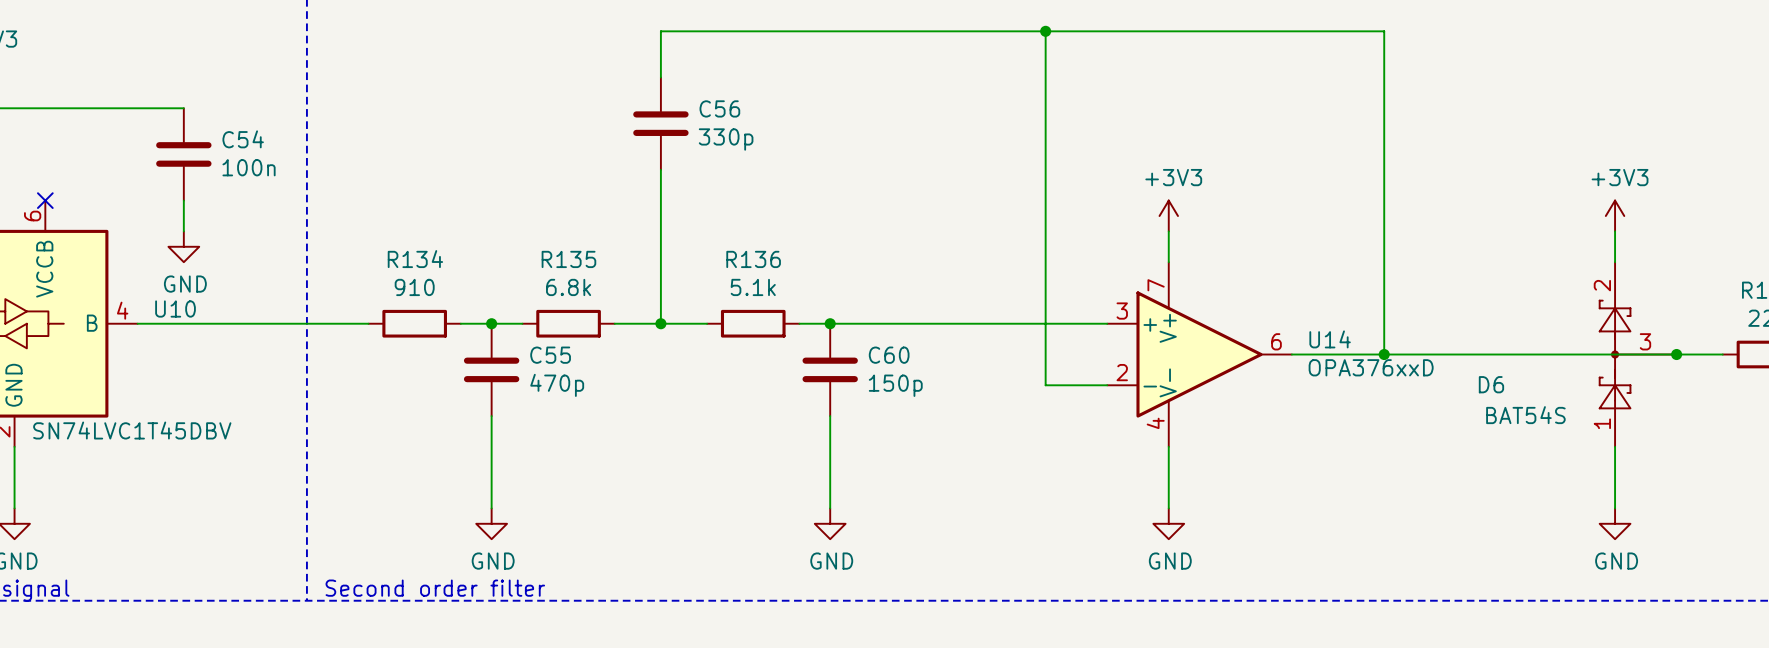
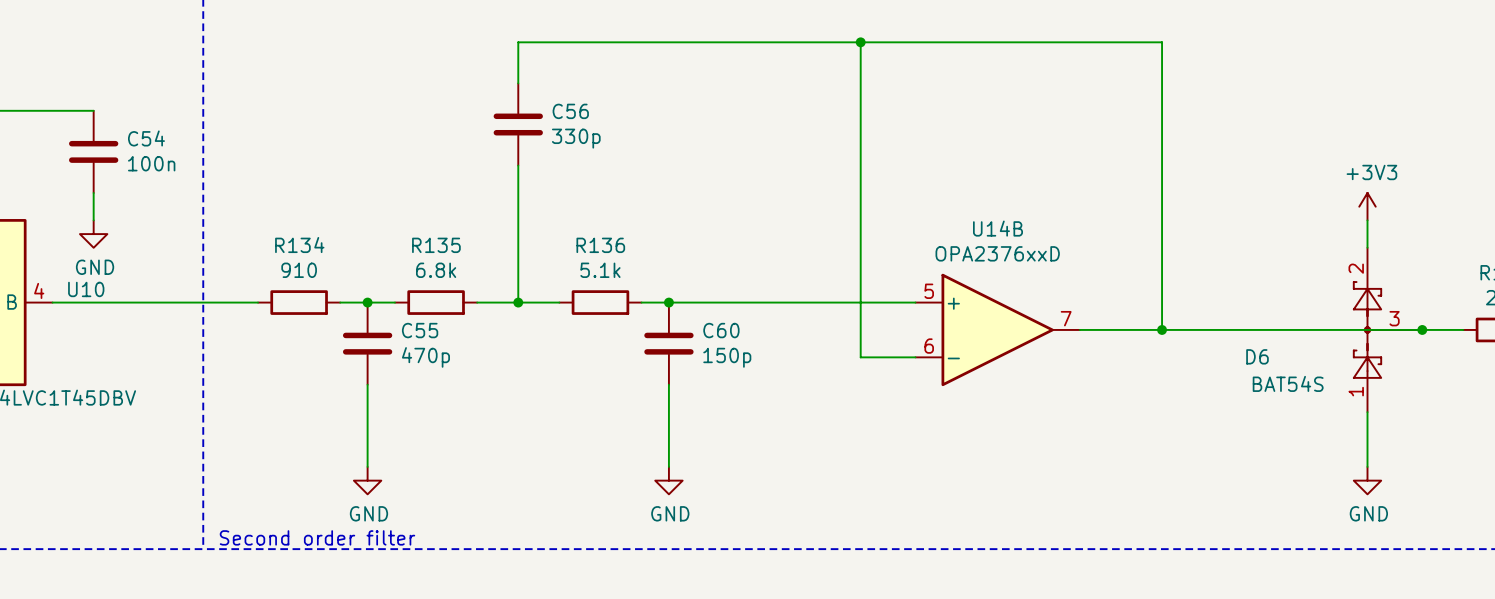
power symbol: +3V3 (1168, 216) -> none
wire: (1168, 231) (1168, 262) -> none
U14: OPA376xxD (1199, 354) -> none
U14B: none -> OPA2376xxD (997, 329)
wire: (1168, 446) (1168, 508) -> none
power symbol: GND (1168, 523) -> none

